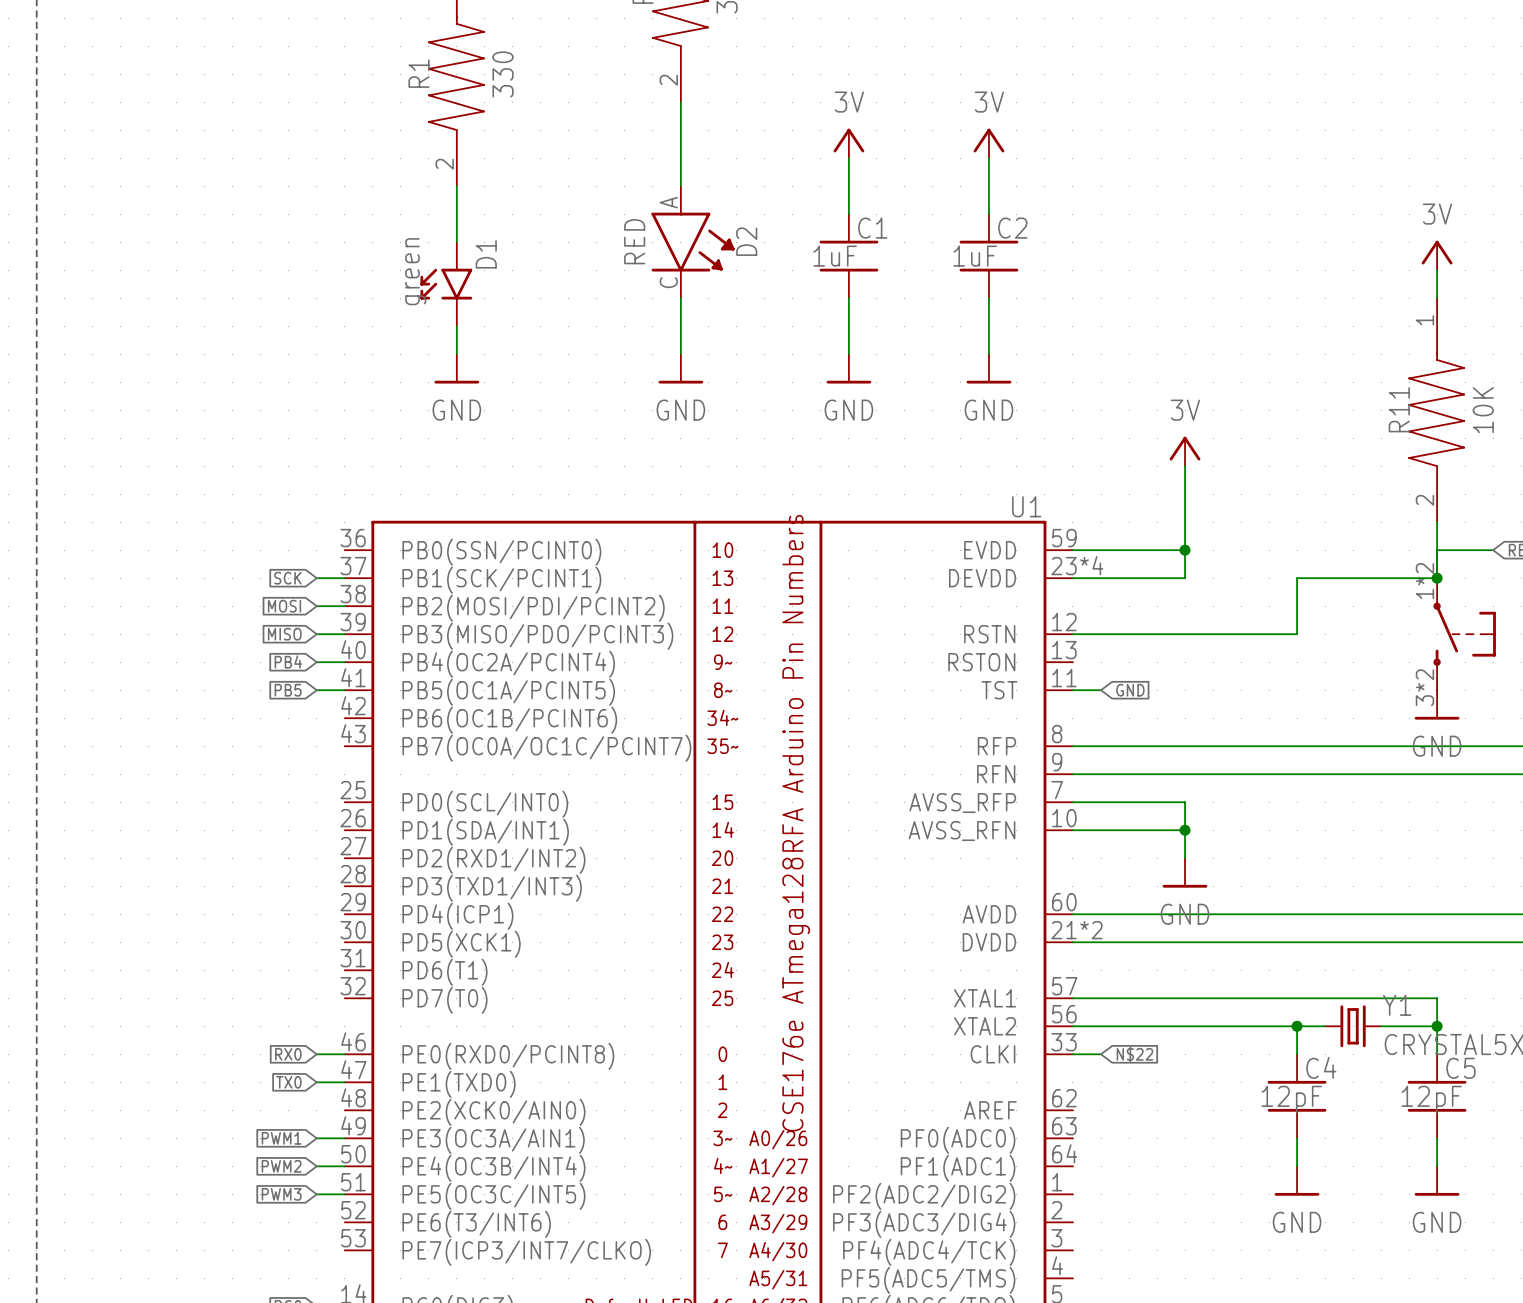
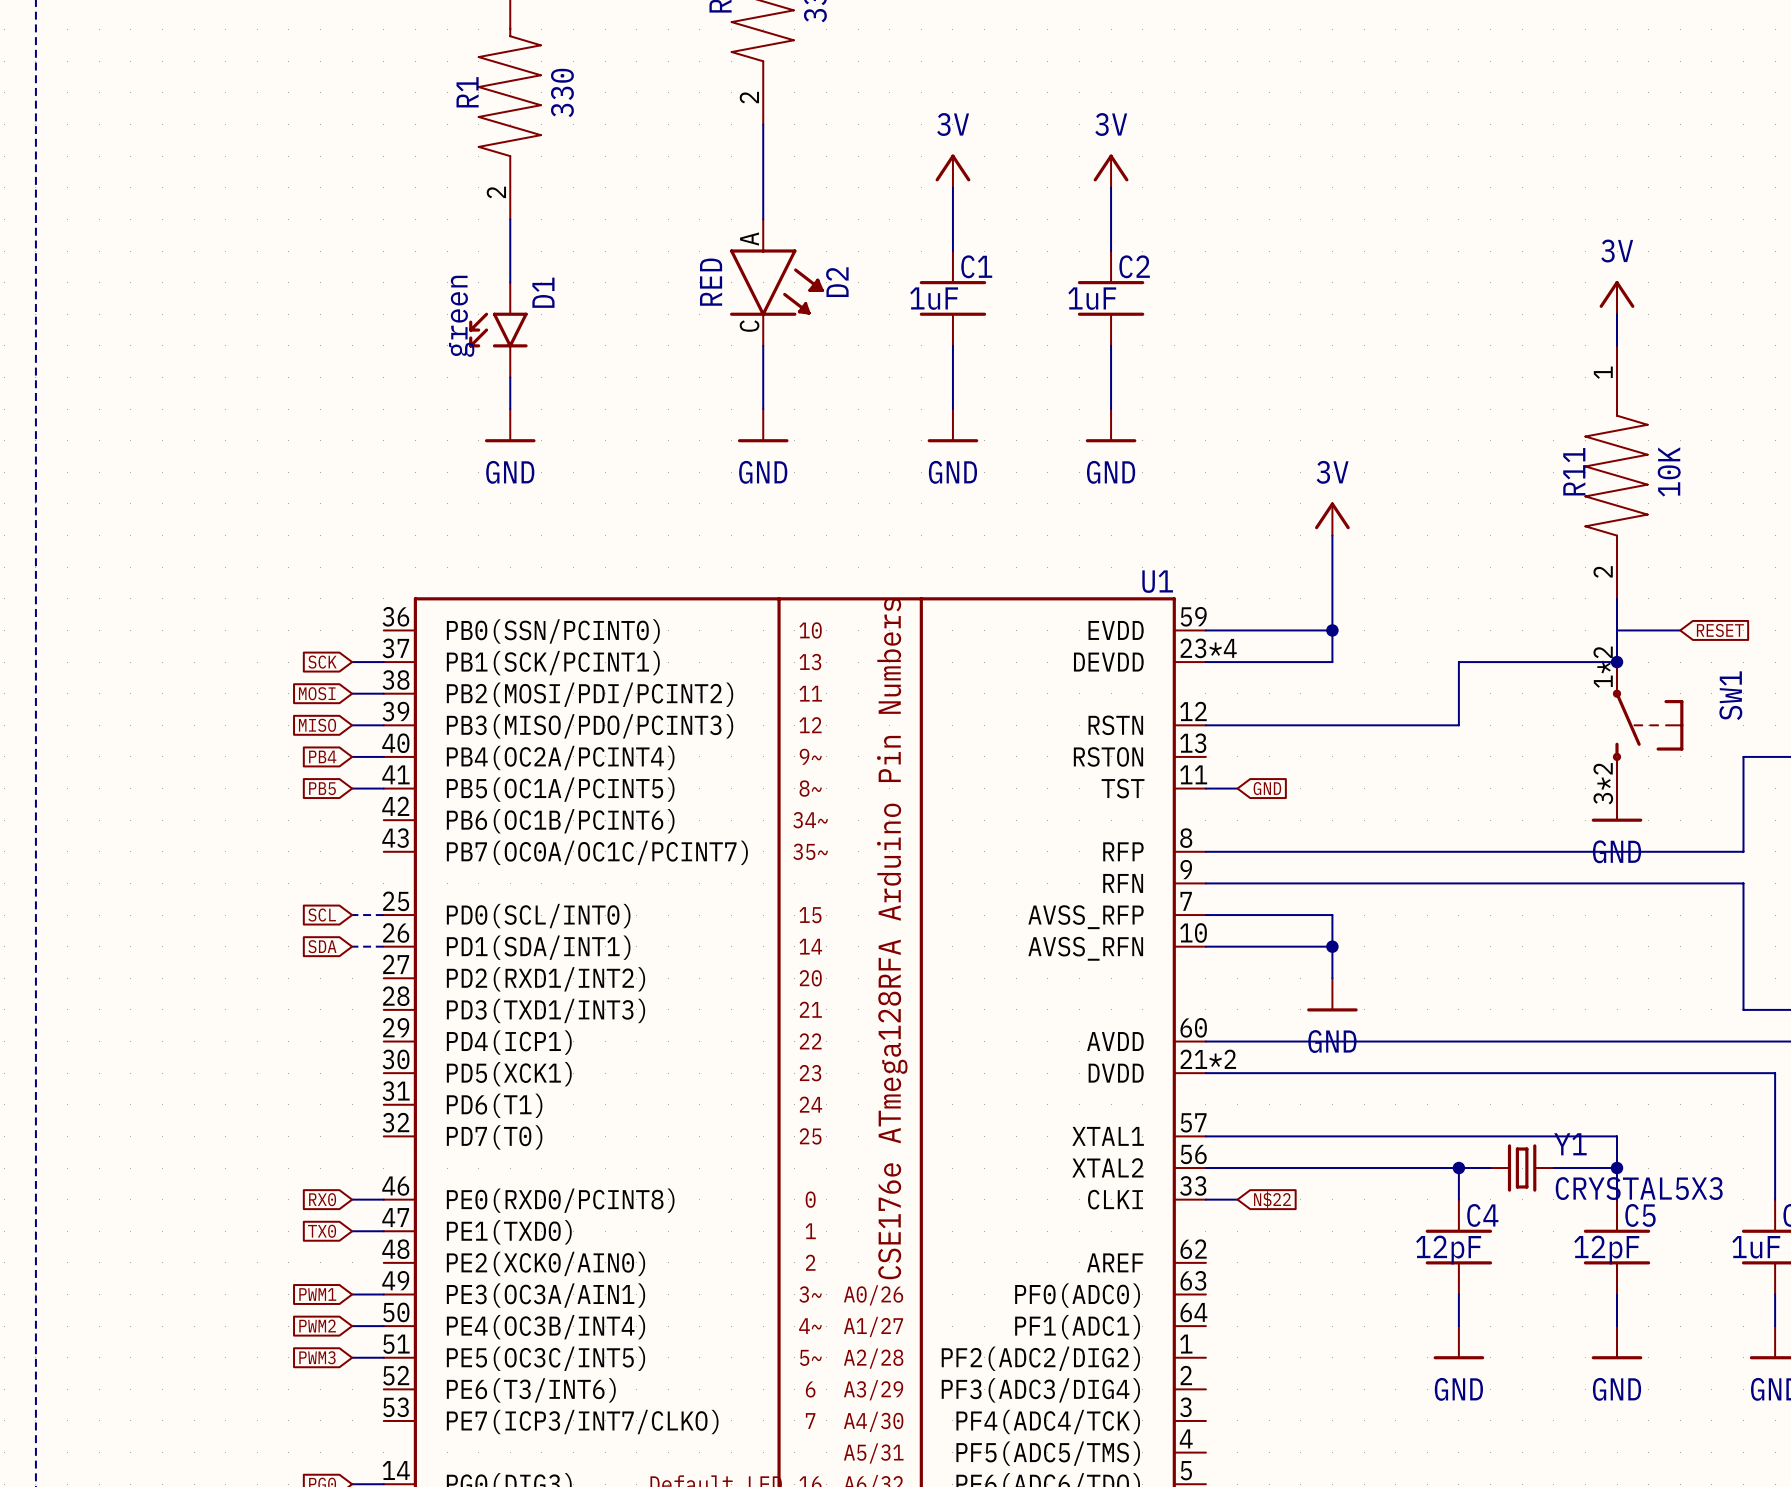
global label: none -> SCL (322, 915)
wire: none -> (352, 915) (383, 915)
global label: none -> SDA (322, 946)
wire: none -> (352, 946) (383, 946)

